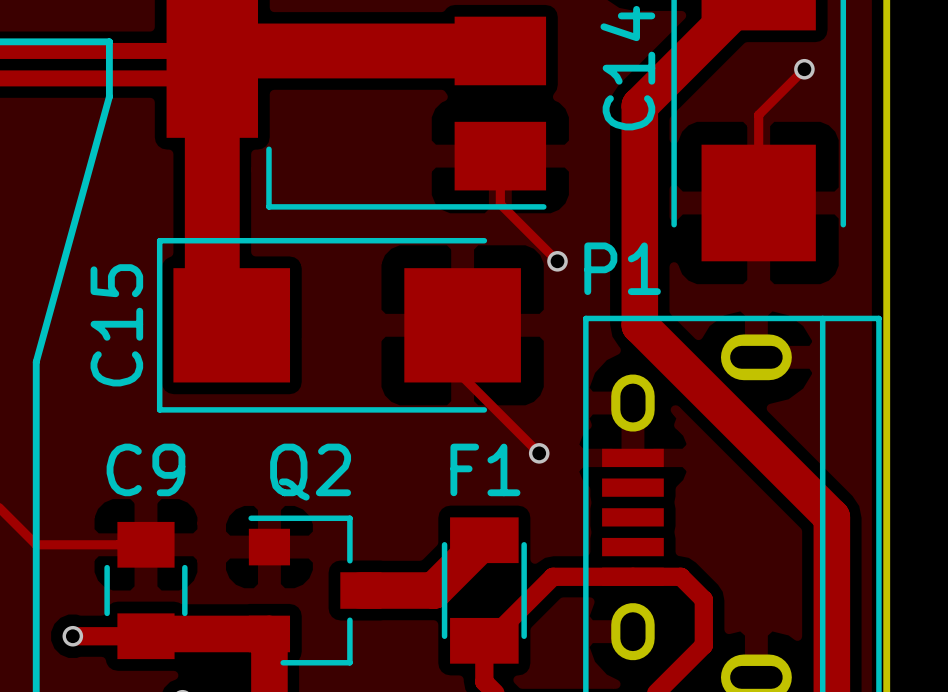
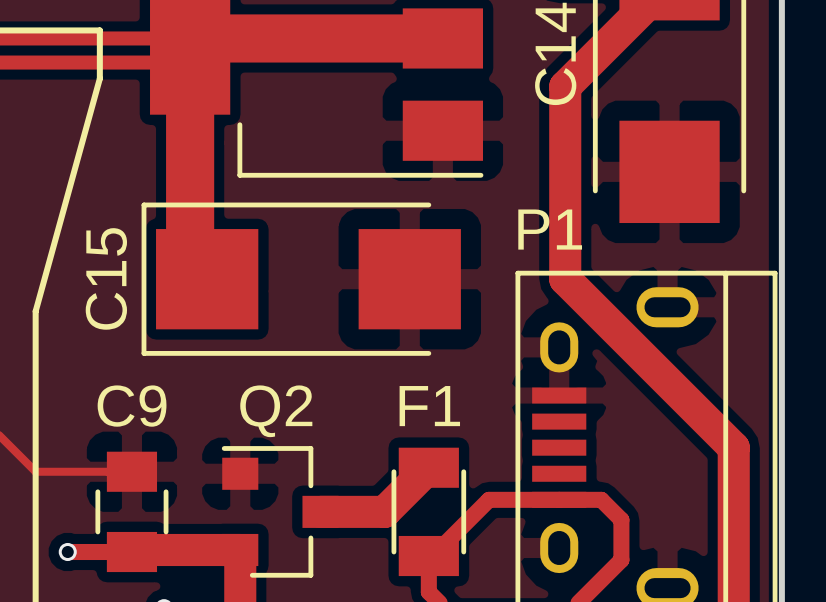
track: (804, 69) (758, 114) (758, 203) -> none
via: (804, 69) -> none
track: (500, 156) (500, 204) (557, 261) -> none
via: (557, 261) -> none
track: (462, 325) (462, 376) (539, 453) -> none
via: (539, 453) -> none

